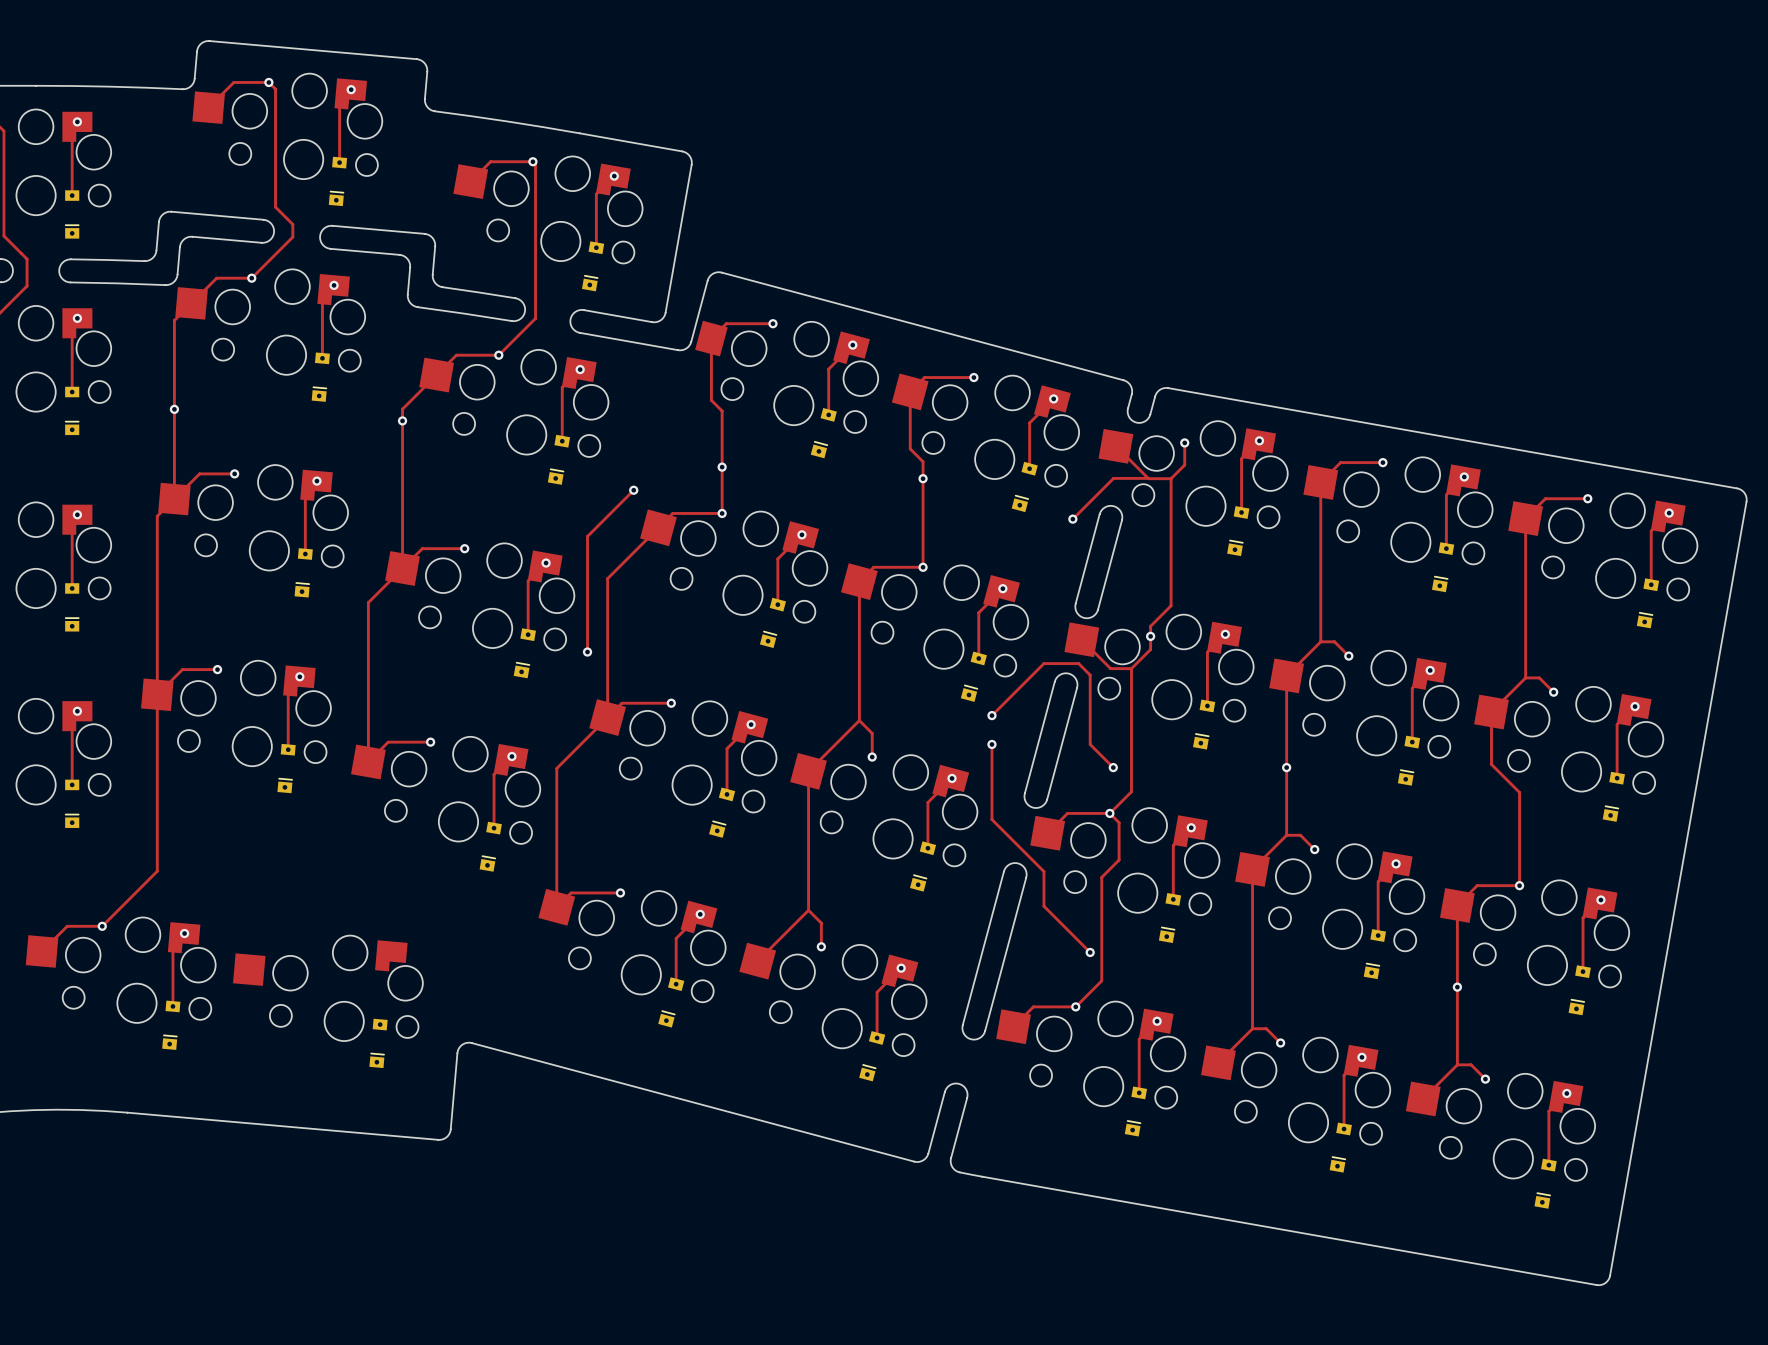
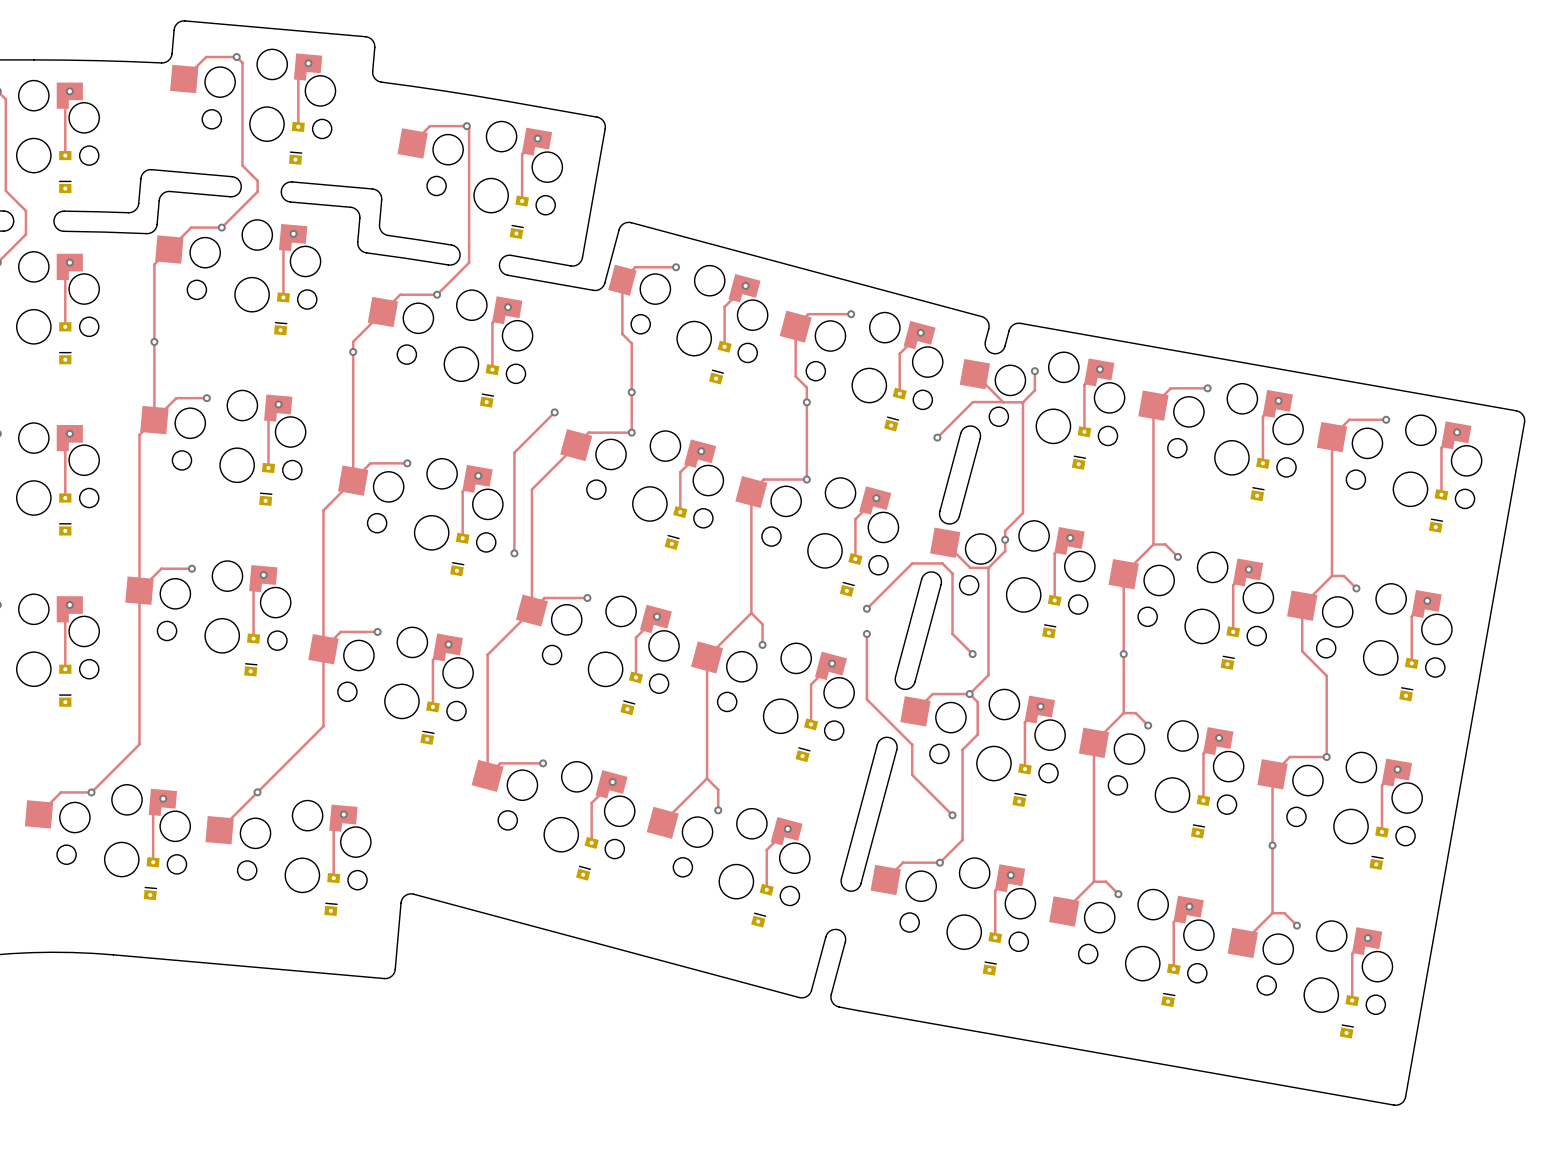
track: none -> (323, 649) (323, 726) (219, 830)
via: none -> (257, 792)
track: none -> (343, 814) (333, 824) (333, 878)
via: none -> (343, 814)

